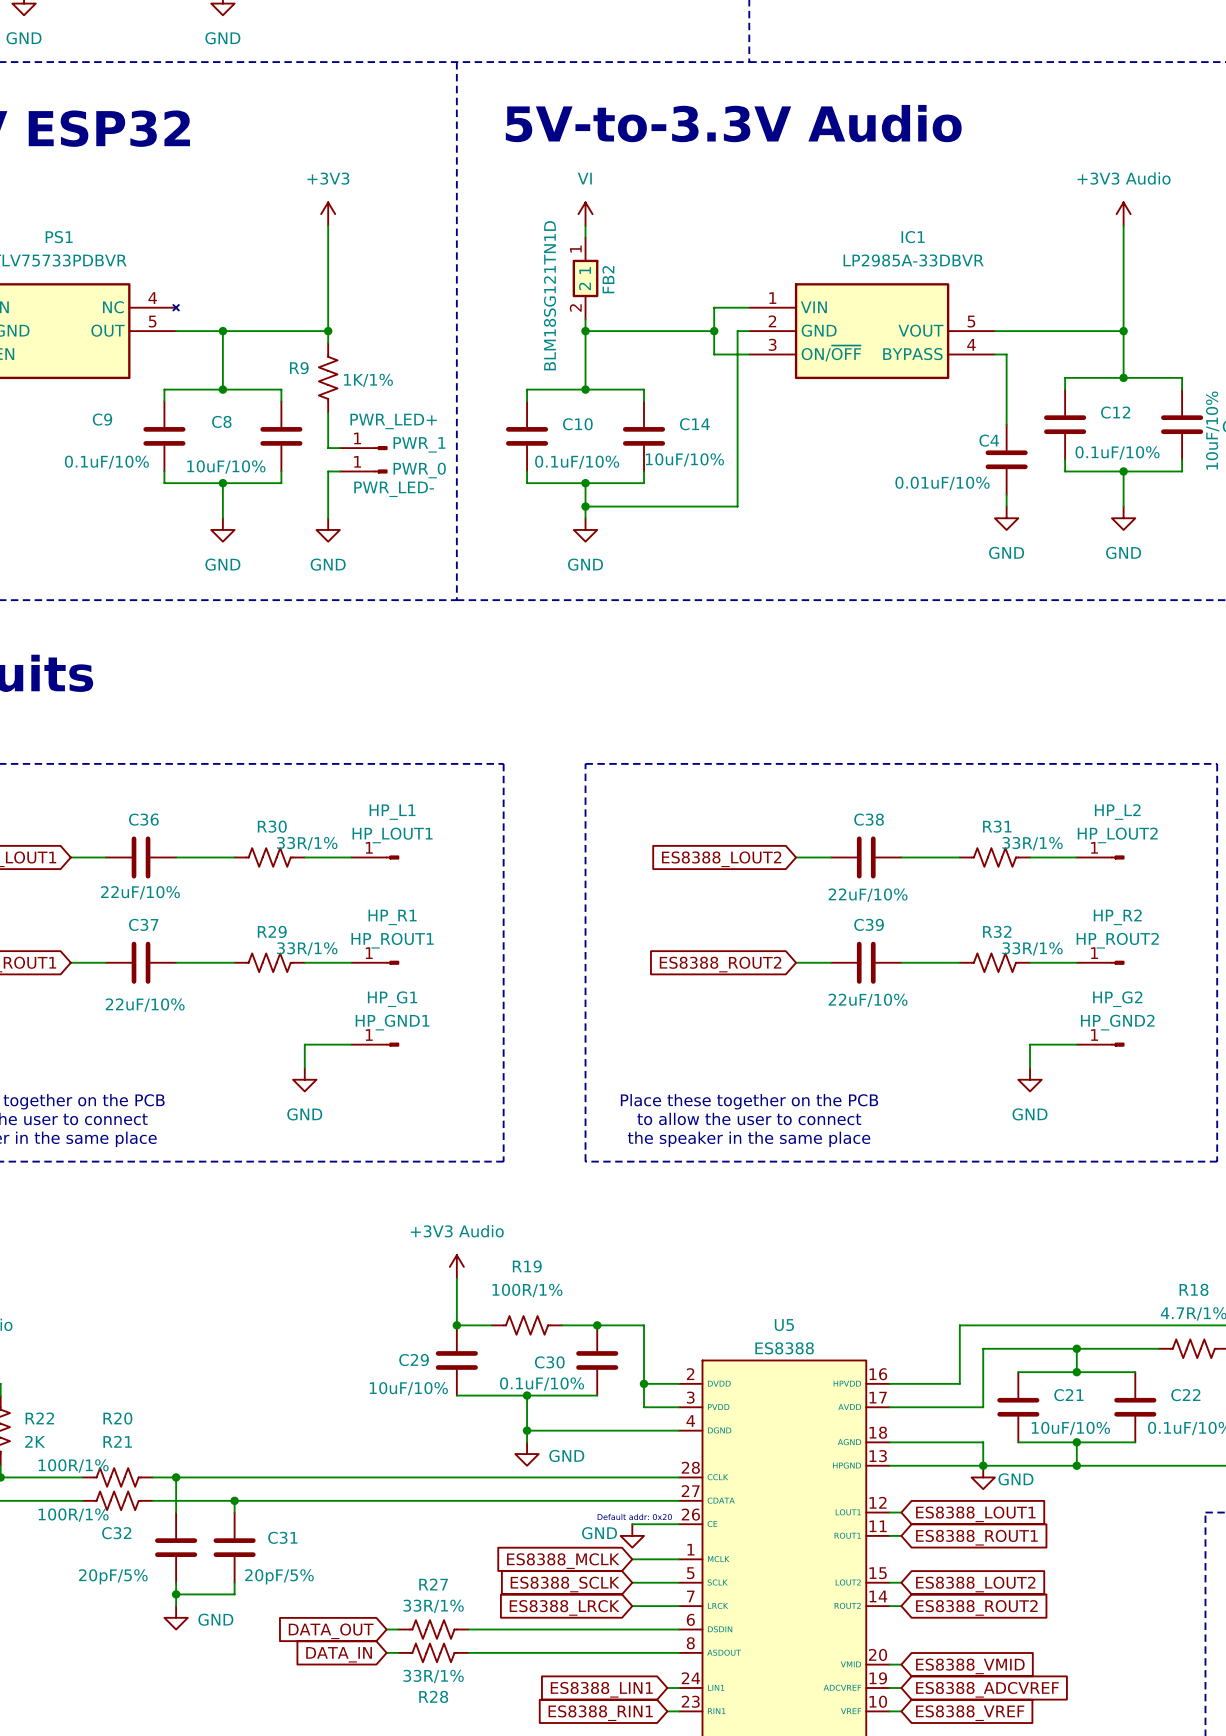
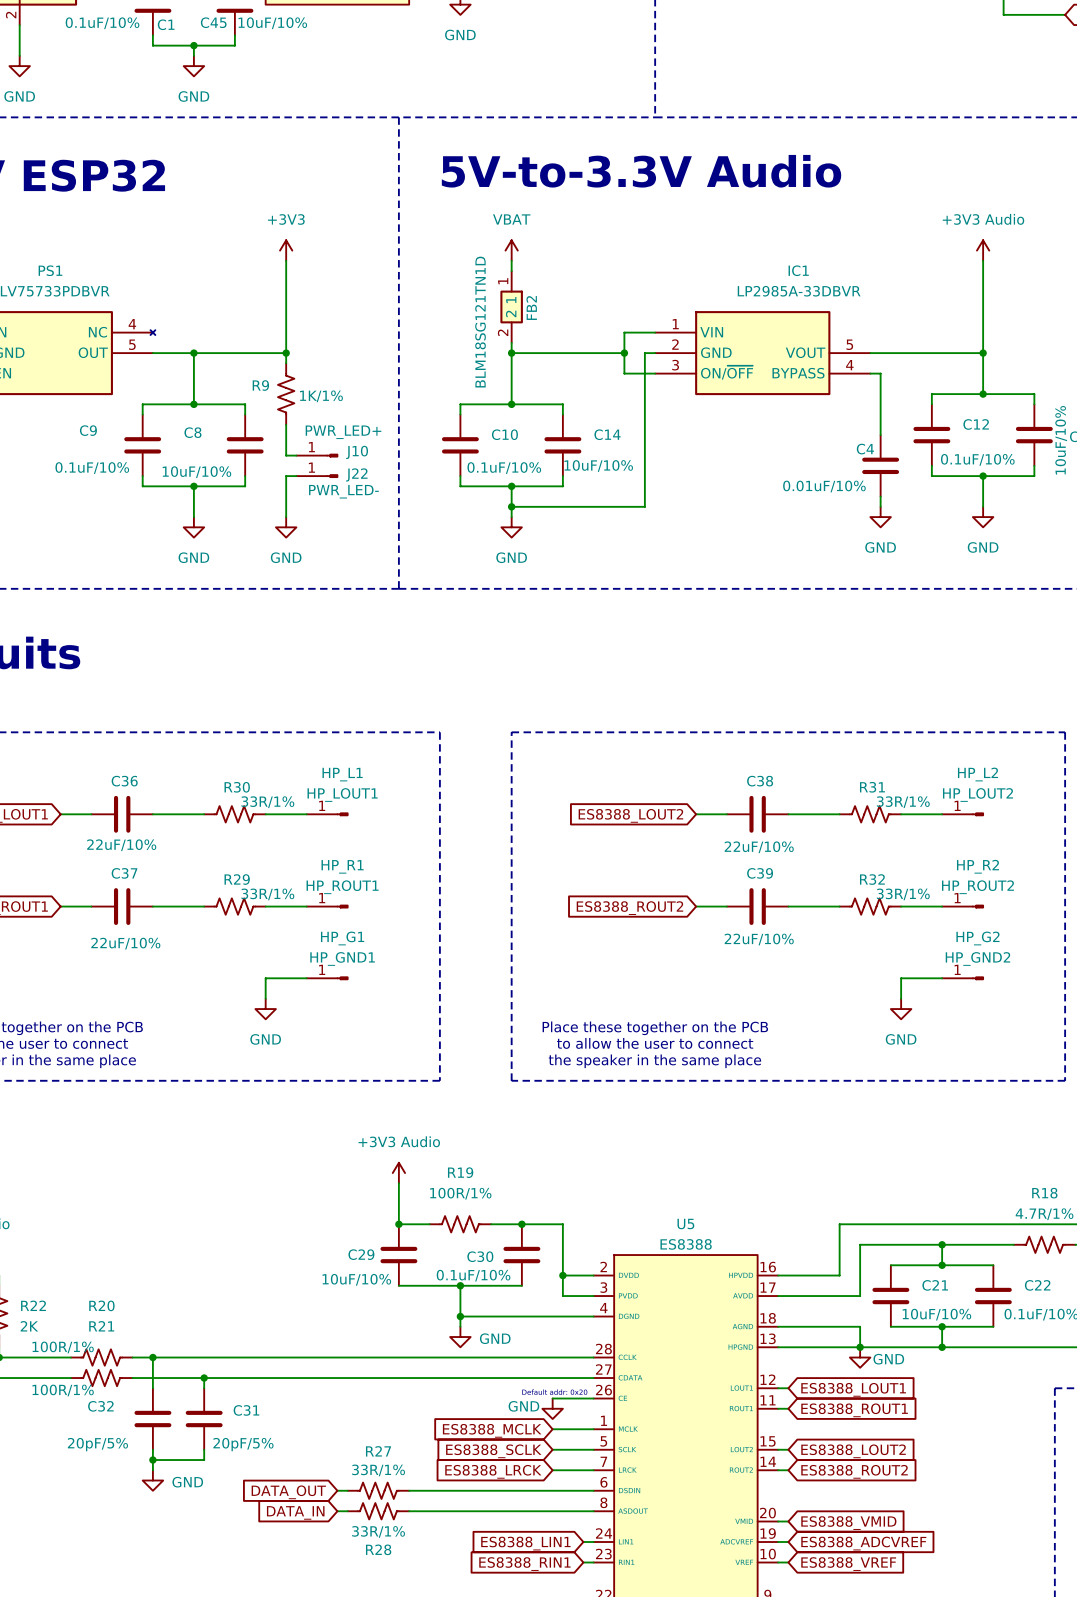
power symbol: VI (585, 214) -> VBAT (511, 250)
PWR_1 name: PWR_1 (419, 444) -> J10 (357, 452)
PWR_0 name: PWR_0 (419, 470) -> J22 (356, 474)

